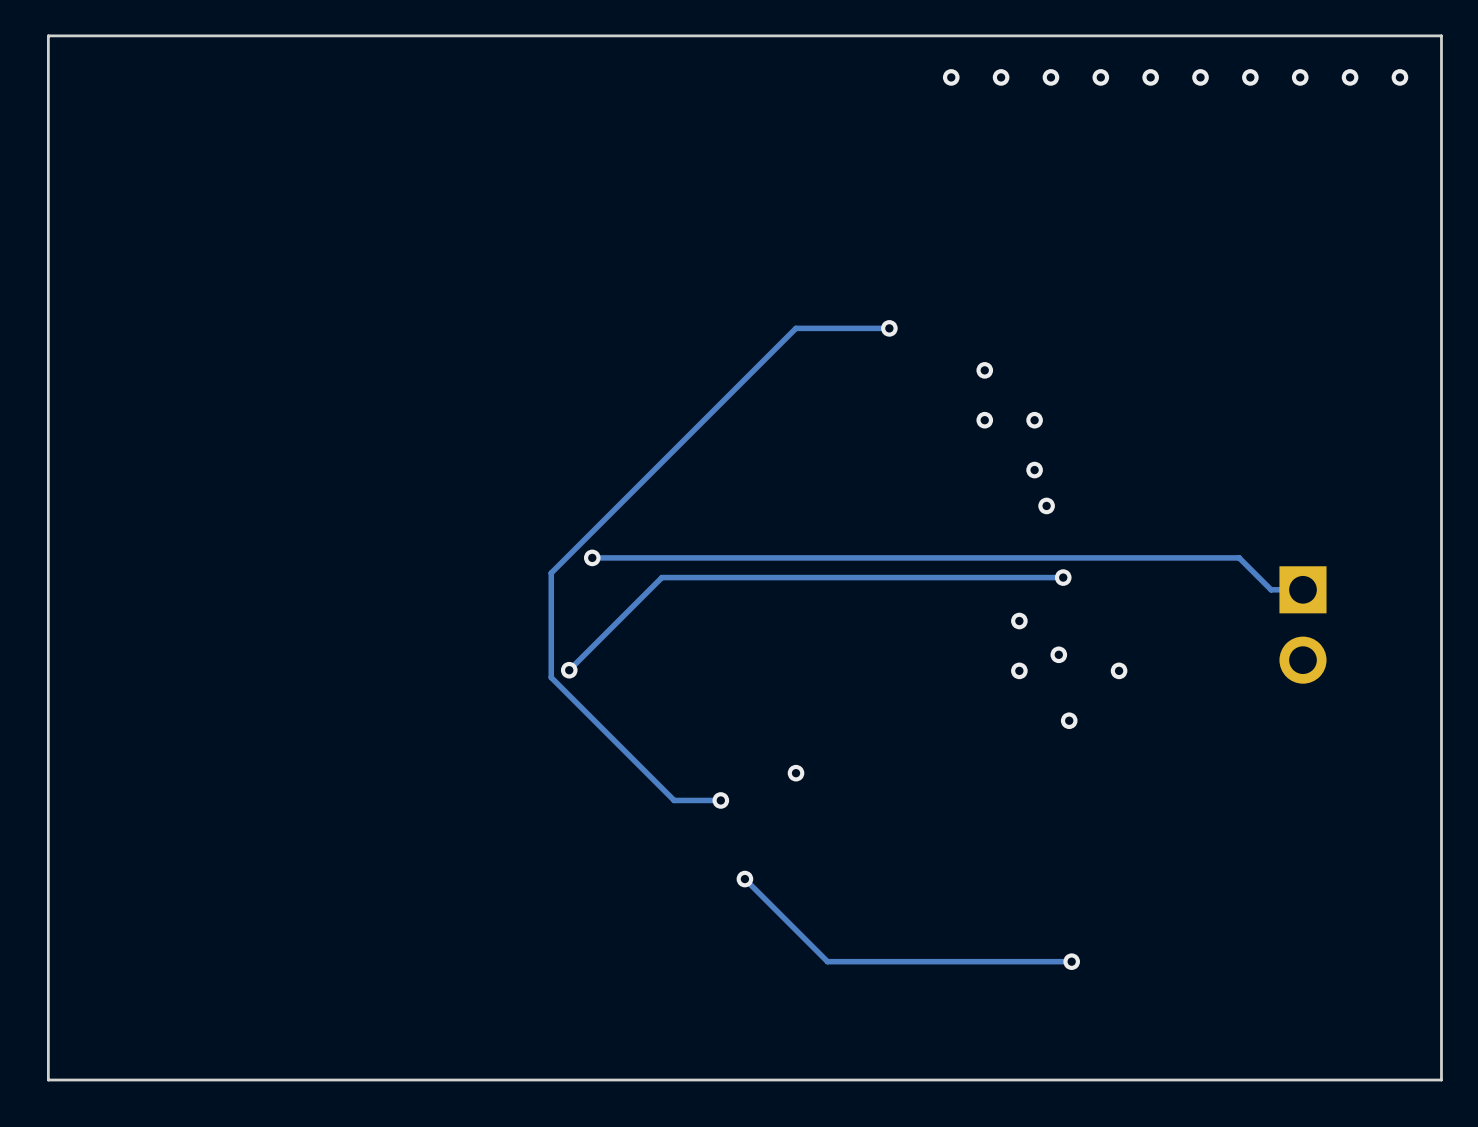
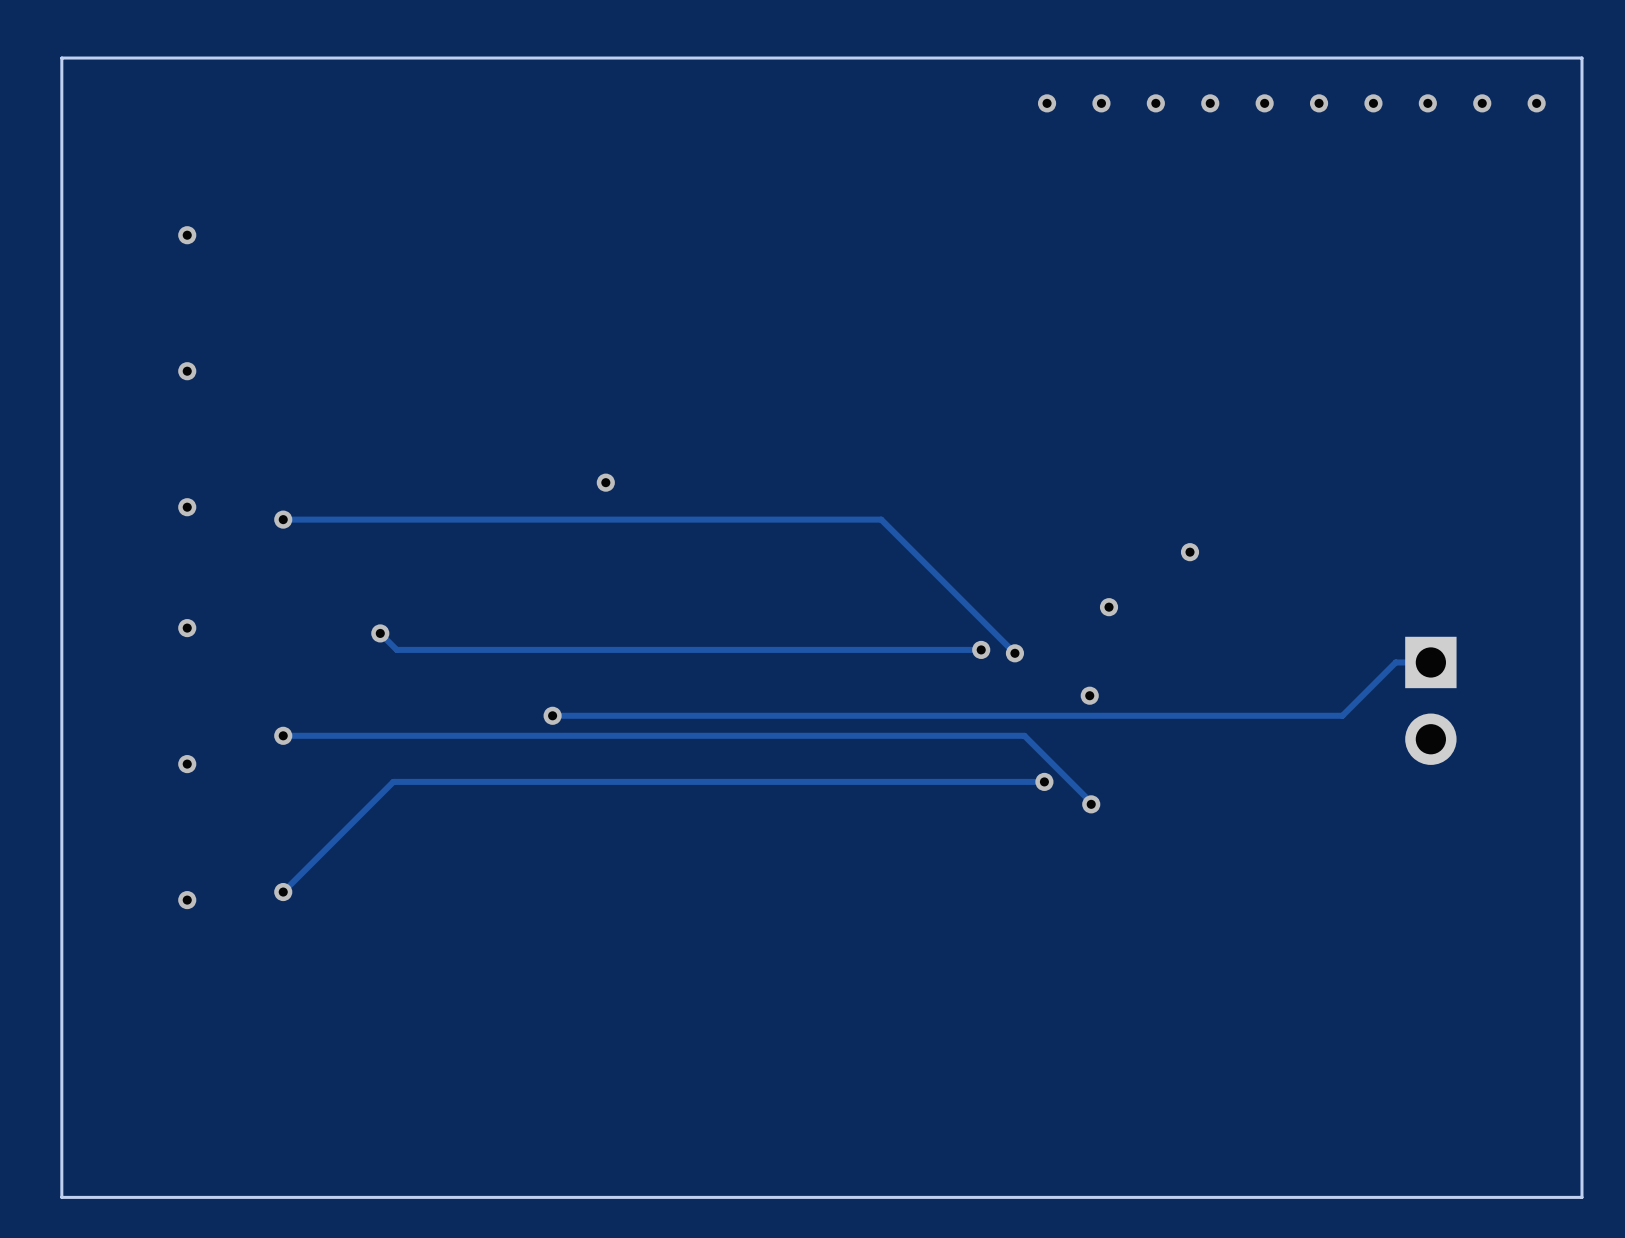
via: none -> (187, 235)
via: none -> (187, 371)
track: (889, 328) (795, 328) (551, 573) (551, 677) (674, 800) (720, 800) -> none
via: (889, 328) -> none
via: (984, 370) -> none
via: (984, 420) -> none
via: (1034, 420) -> none
via: none -> (605, 482)
via: none -> (187, 507)
track: none -> (283, 519) (881, 519) (1014, 653)
via: none -> (283, 519)
via: (1034, 470) -> none
via: none -> (1190, 552)
via: (1046, 505) -> none
via: none -> (1109, 607)
track: (592, 557) (1239, 557) (1271, 589) -> (552, 715) (1342, 715) (1395, 662)
via: (592, 557) -> none
via: none -> (187, 628)
track: none -> (380, 633) (396, 649) (981, 649)
via: none -> (380, 633)
track: (1063, 577) (661, 577) (569, 670) -> none
via: (1063, 577) -> none
via: none -> (981, 649)
via: none -> (1014, 653)
via: none -> (1089, 695)
via: (1019, 621) -> none
via: none -> (552, 715)
via: (1058, 654) -> none
track: none -> (283, 735) (1024, 735) (1091, 804)
via: none -> (283, 735)
via: (569, 670) -> none
via: (1019, 670) -> none
via: (1119, 670) -> none
via: none -> (187, 764)
track: none -> (1044, 781) (393, 781) (283, 892)
via: none -> (1044, 781)
via: none -> (1091, 804)
via: (1069, 720) -> none
via: (796, 773) -> none
via: none -> (283, 892)
via: (720, 800) -> none
via: none -> (187, 900)
track: (744, 879) (827, 961) (1071, 961) -> none
via: (744, 879) -> none
via: (1071, 961) -> none

